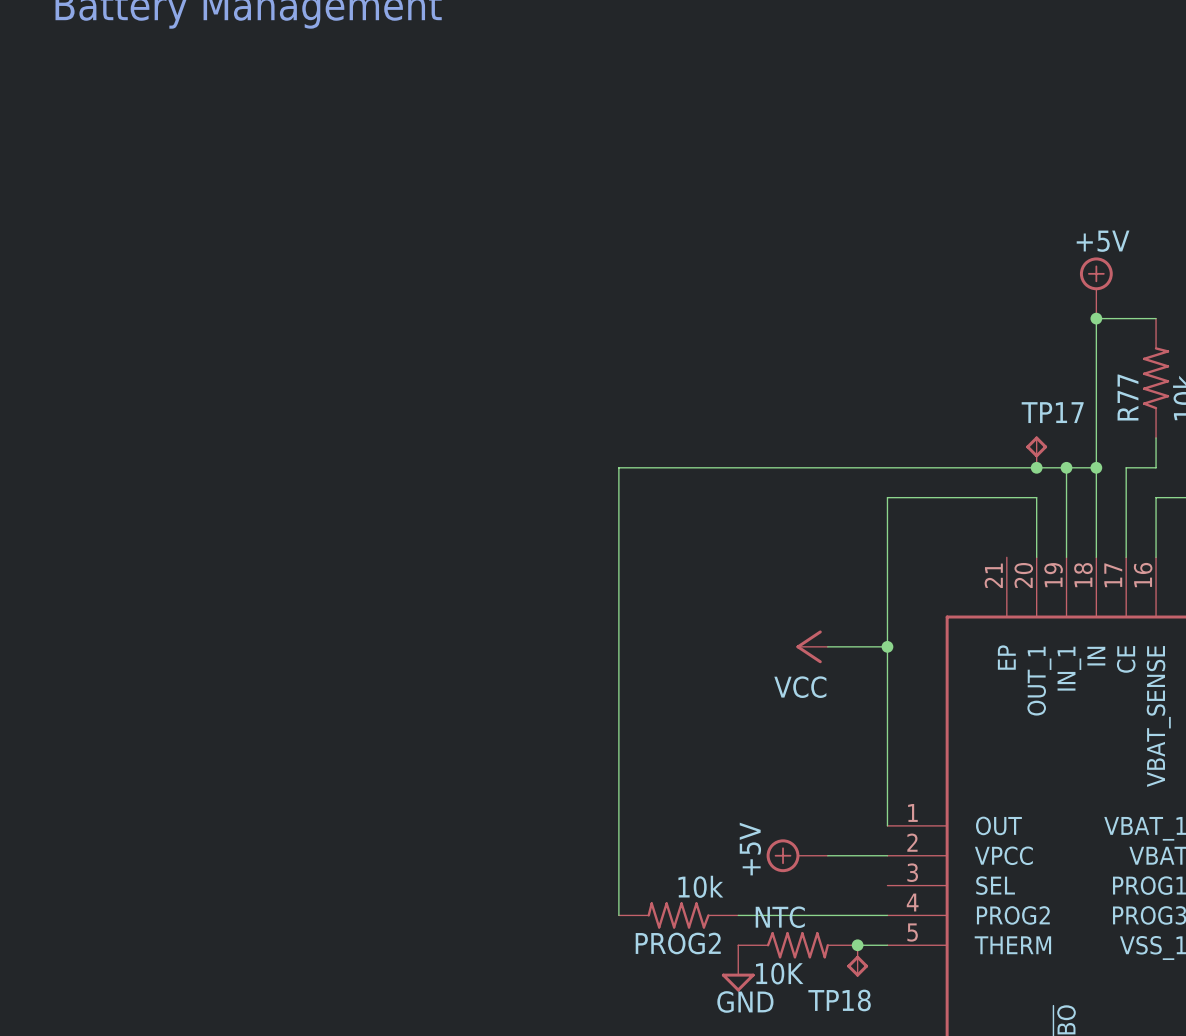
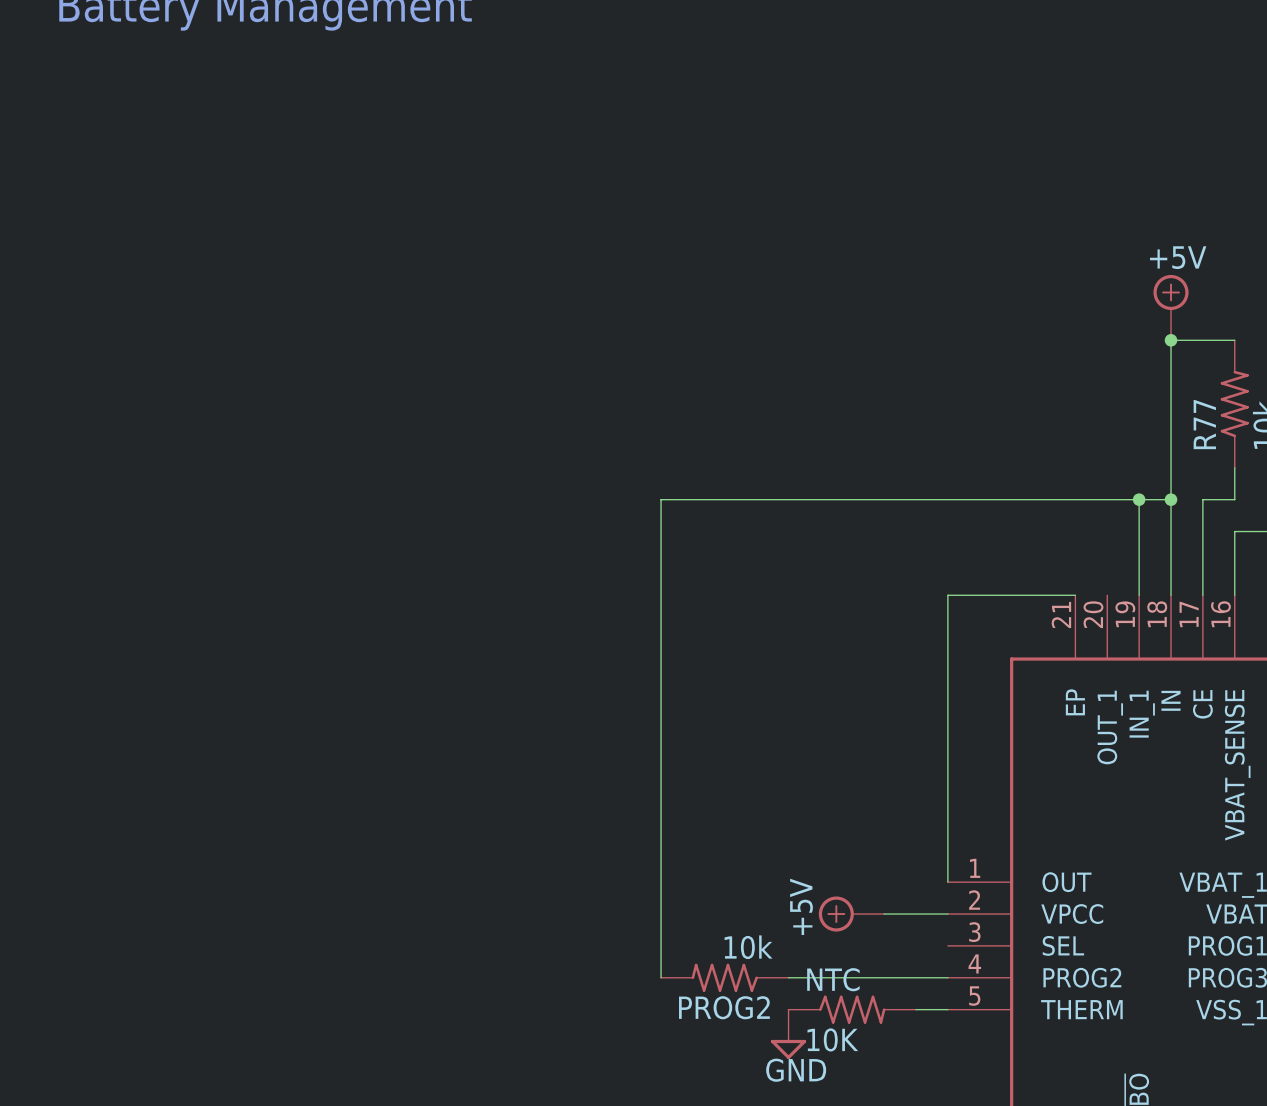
TP17: (1036, 452) -> none
junction: (1036, 467) -> none
wire: (887, 557) (887, 497) (1036, 497) (1036, 557) -> (947, 595) (1075, 595)
power symbol: VCC (812, 646) -> none
wire: (827, 646) (887, 646) -> none
junction: (887, 646) -> none
junction: (857, 945) -> none
TP18: (857, 960) -> none

